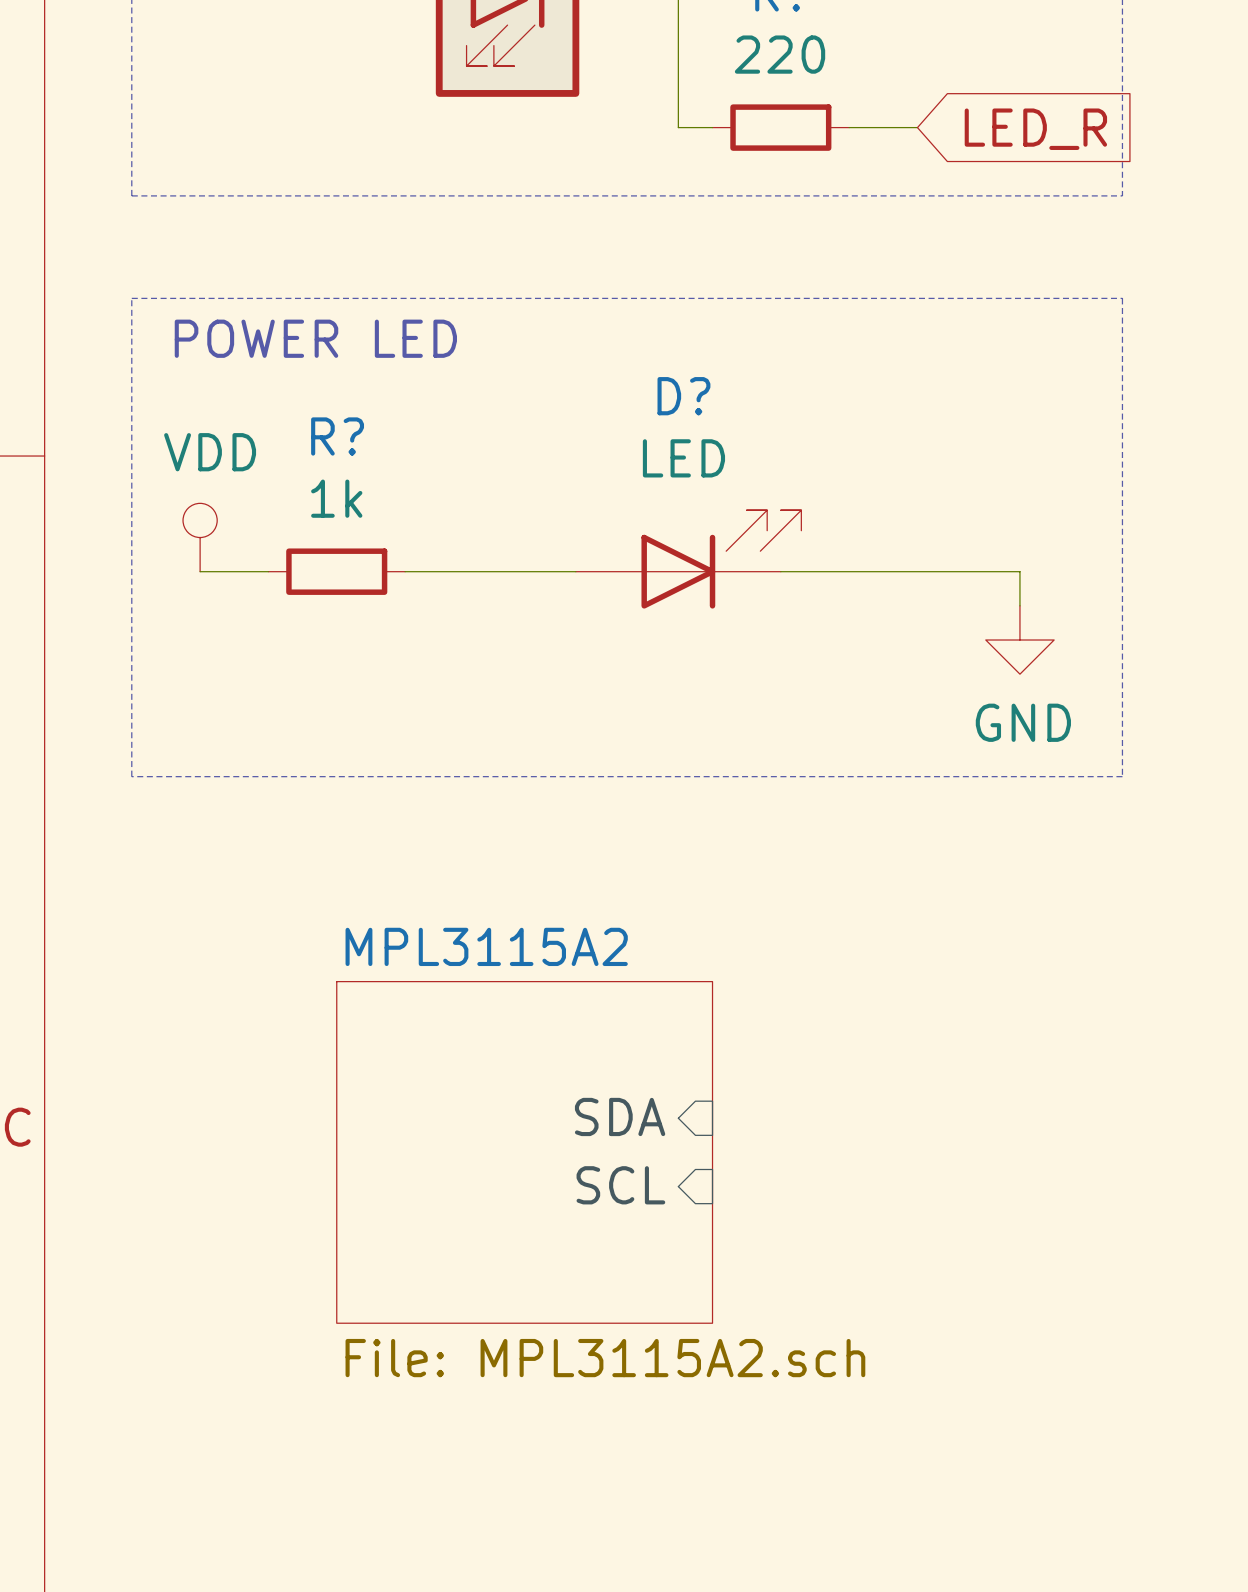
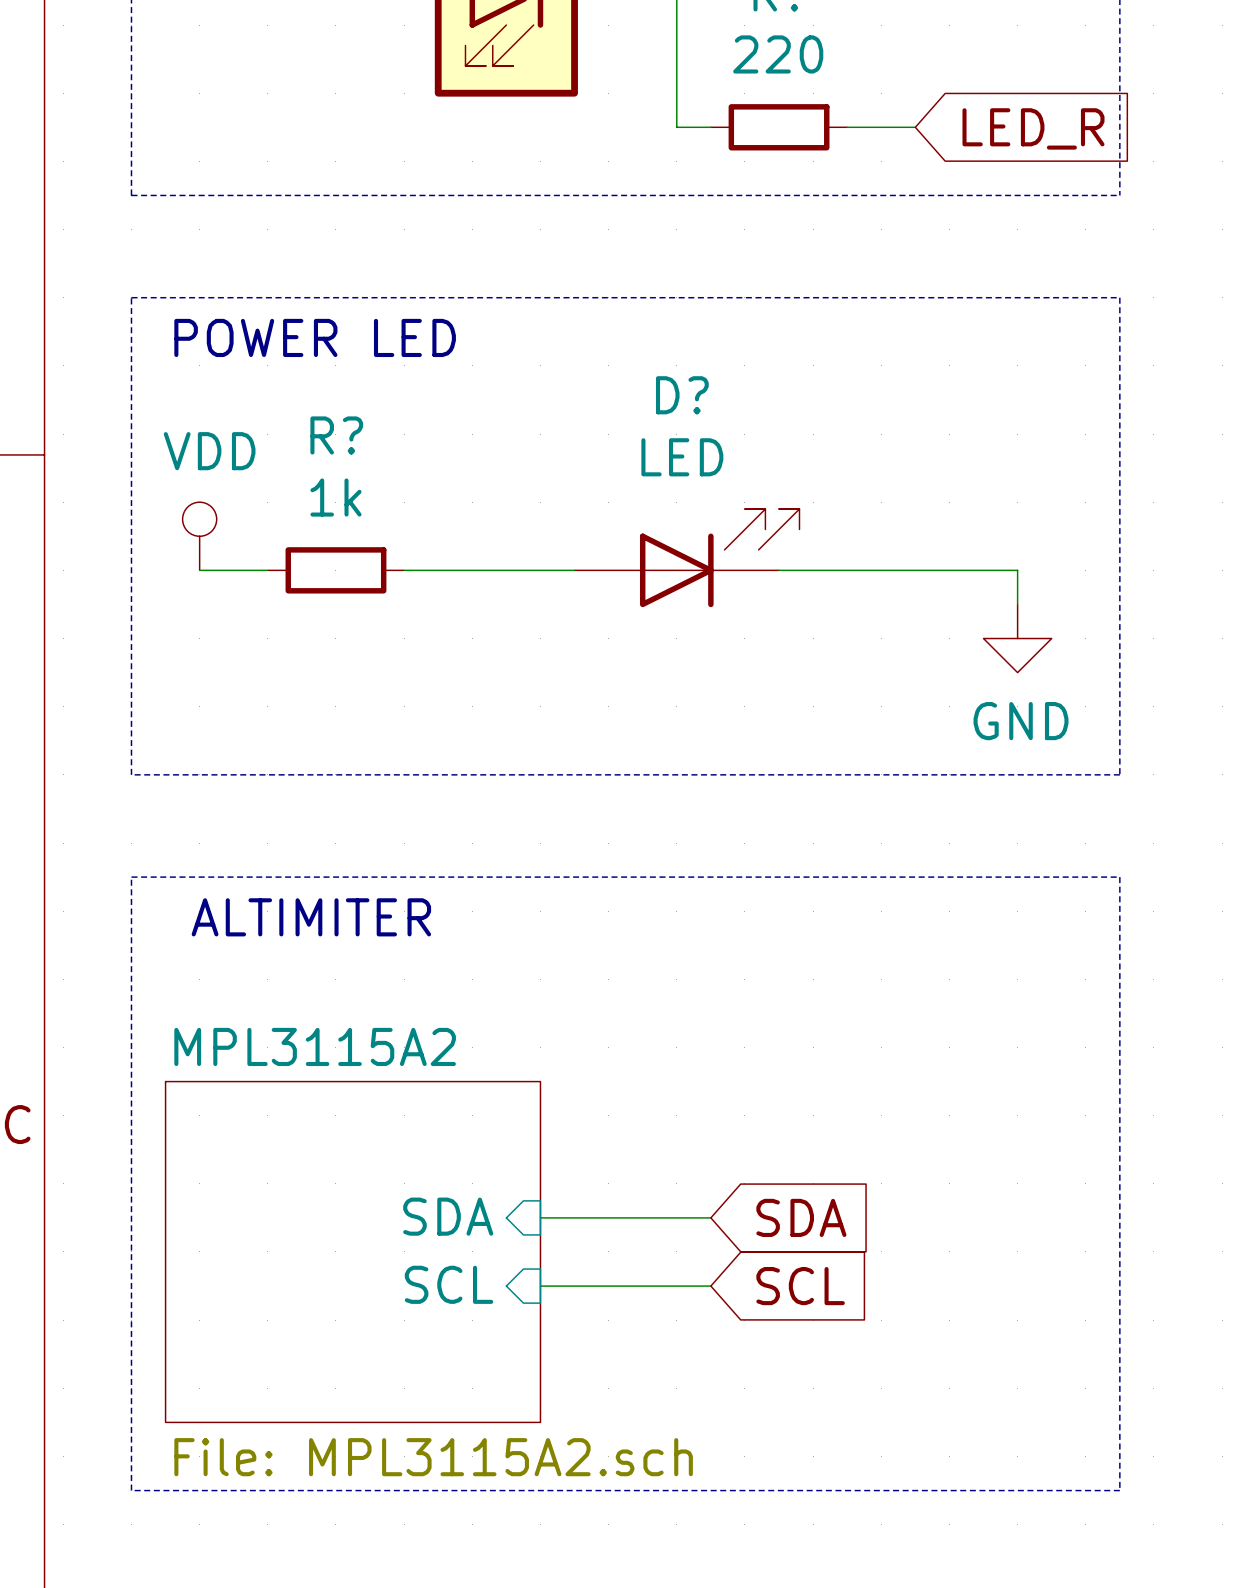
line: none -> (131, 877) (1119, 877) (1119, 1490) (131, 1490) (131, 877)
text: none -> ALTIMITER (311, 917)
sheet pin position: SDA (620, 1116) -> SDA (448, 1216)
sheet MPL3115A2 position: (524, 1152) -> (353, 1251)
sheet pin position: SCL (620, 1185) -> SCL (449, 1284)
wire: none -> (540, 1217) (710, 1217)
global label: none -> SDA (801, 1217)
wire: none -> (540, 1286) (710, 1286)
global label: none -> SCL (800, 1286)

